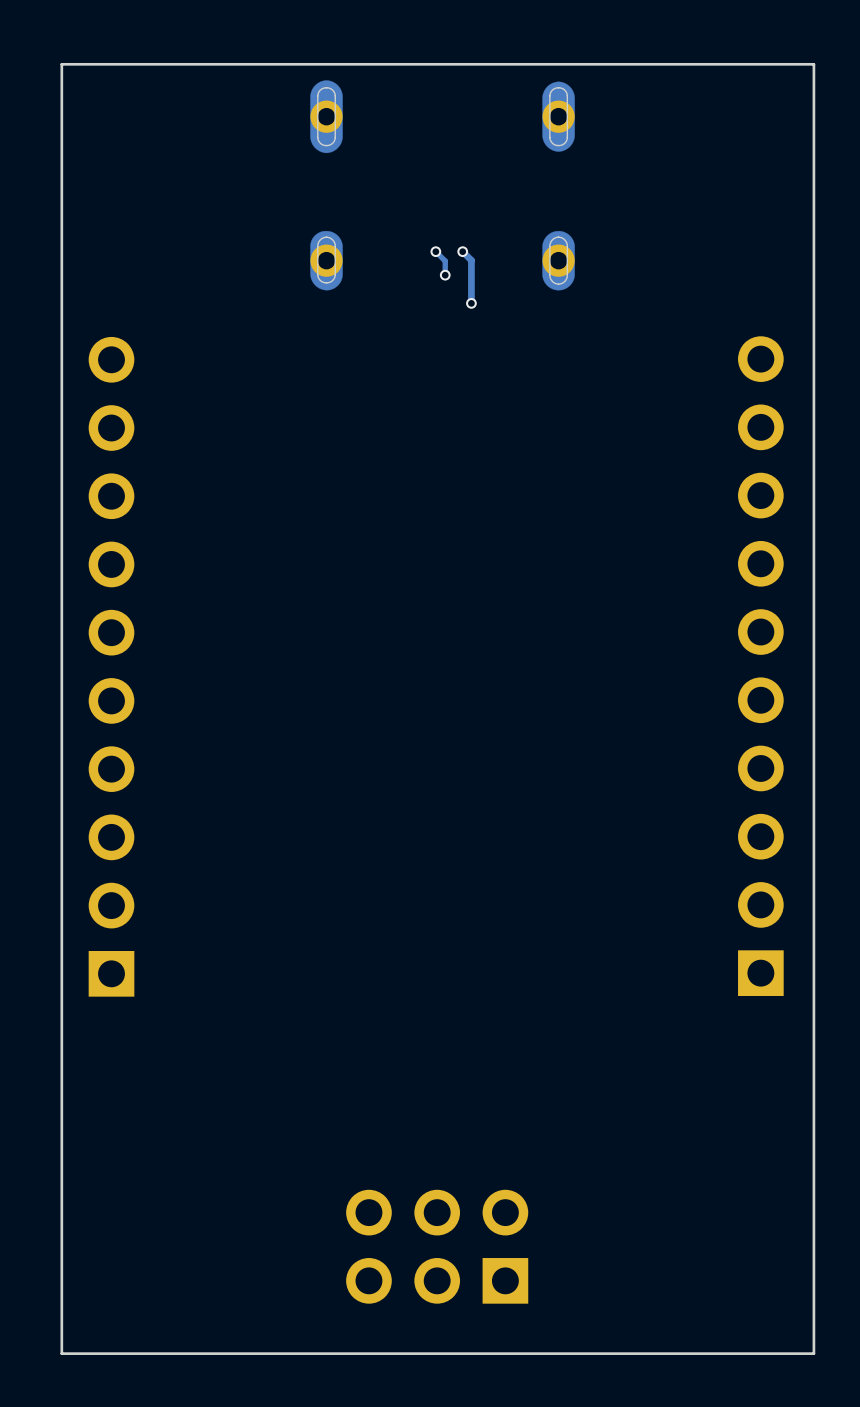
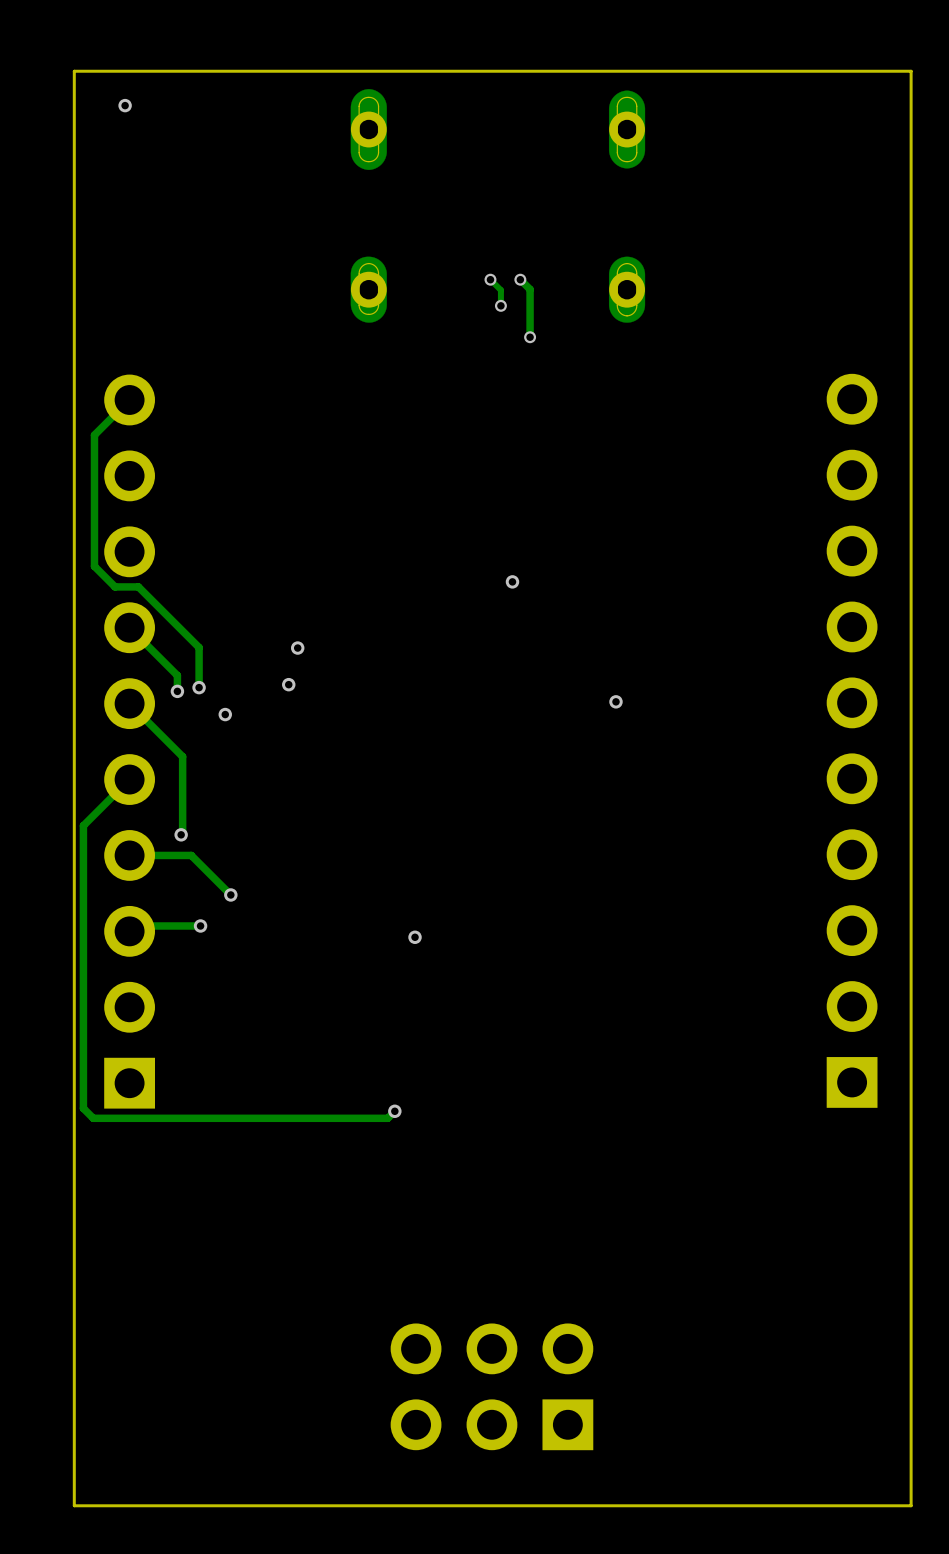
via: none -> (125, 105)
track: none -> (129, 399) (94, 435) (94, 566) (115, 586) (138, 586) (199, 647) (199, 687)
via: none -> (512, 581)
track: none -> (129, 627) (177, 675) (177, 691)
via: none -> (297, 648)
via: none -> (288, 684)
via: none -> (199, 687)
via: none -> (177, 691)
via: none -> (615, 701)
track: none -> (129, 703) (182, 756) (181, 834)
via: none -> (225, 714)
track: none -> (129, 779) (83, 825) (83, 1108) (93, 1118) (387, 1118) (394, 1111)
via: none -> (181, 834)
track: none -> (129, 855) (191, 855) (230, 894)
via: none -> (230, 894)
track: none -> (200, 925) (134, 925) (129, 931)
via: none -> (200, 925)
via: none -> (415, 937)
via: none -> (394, 1111)

